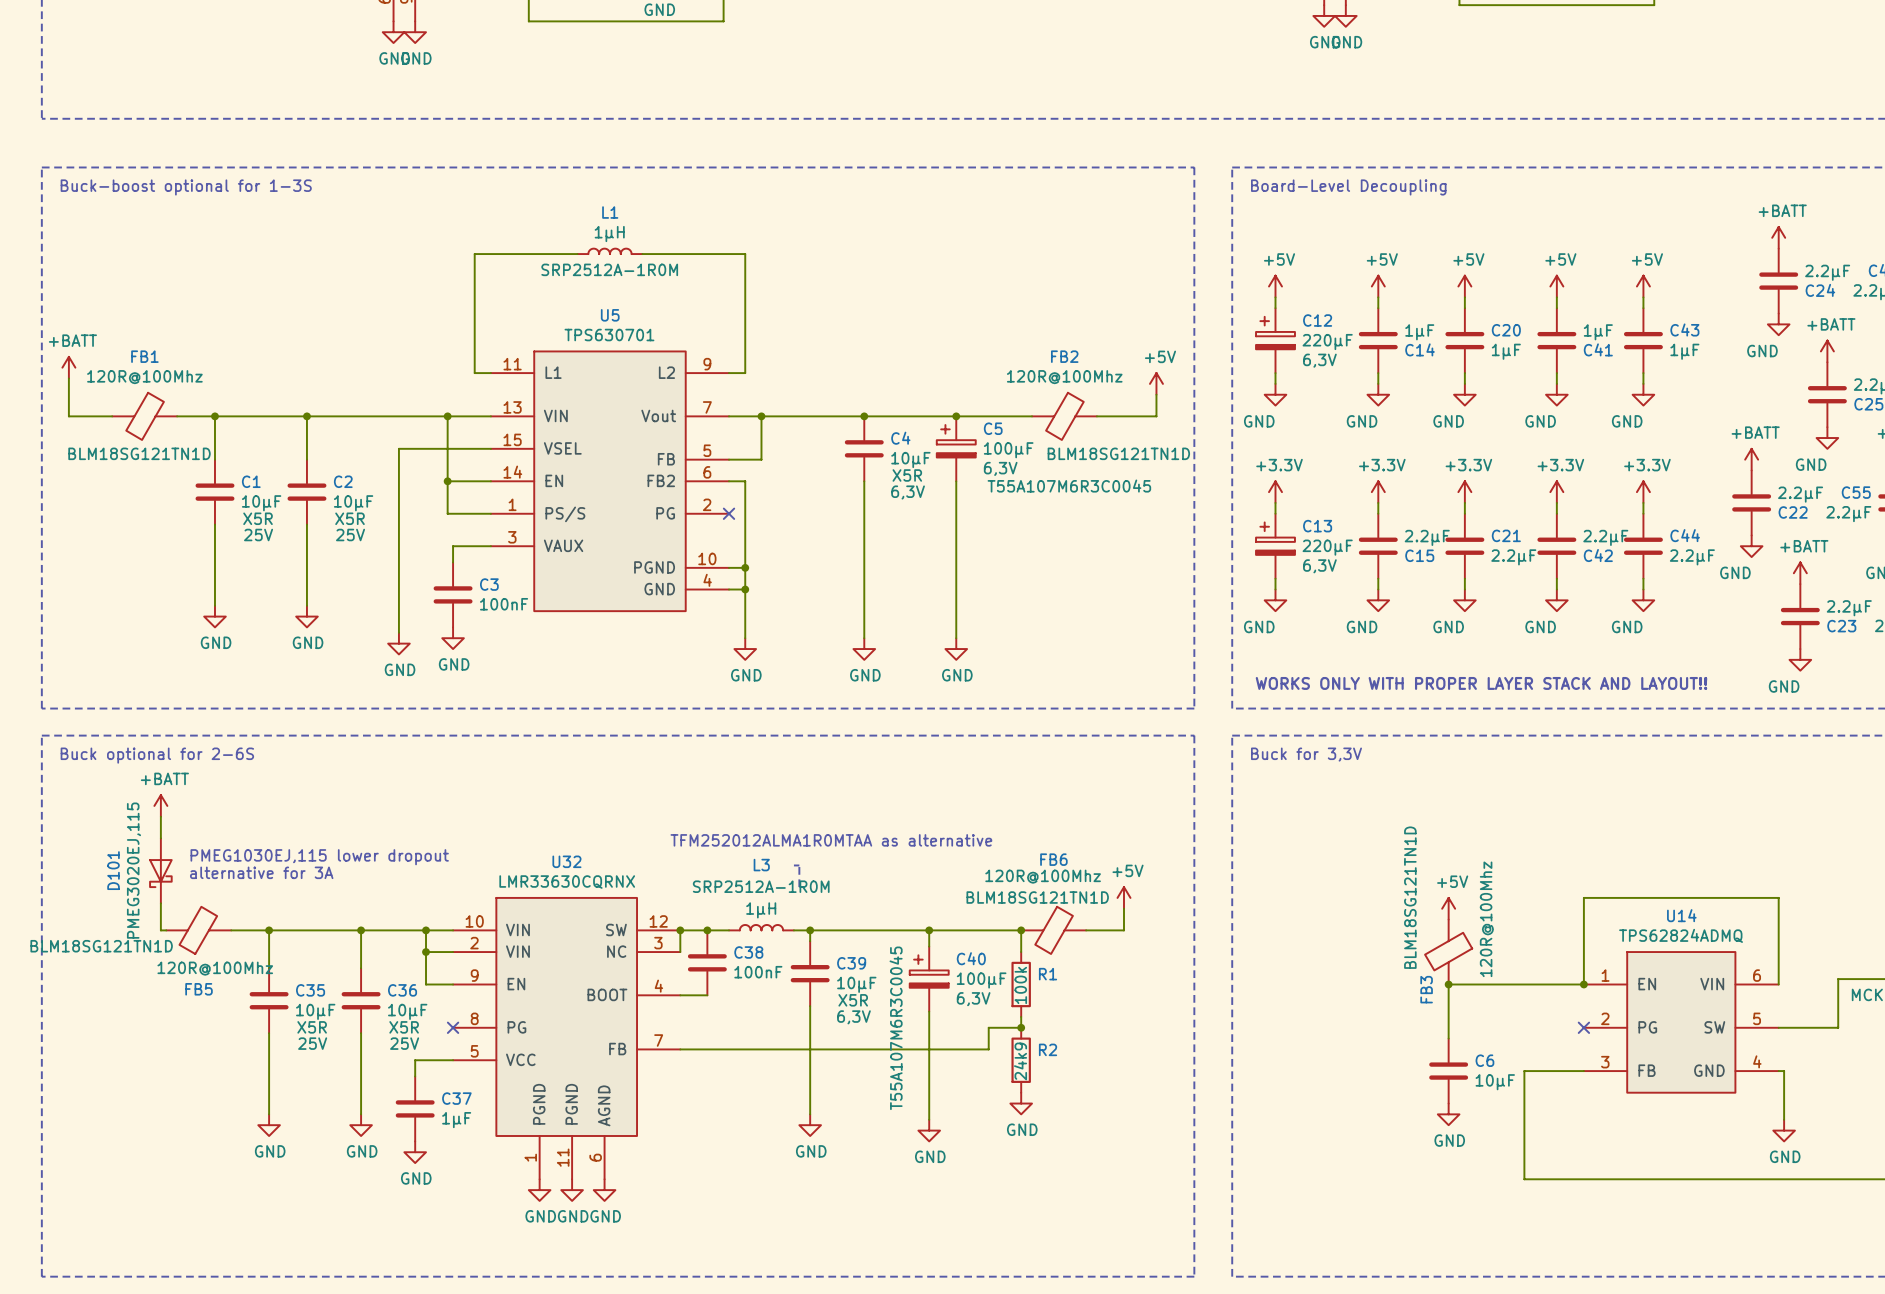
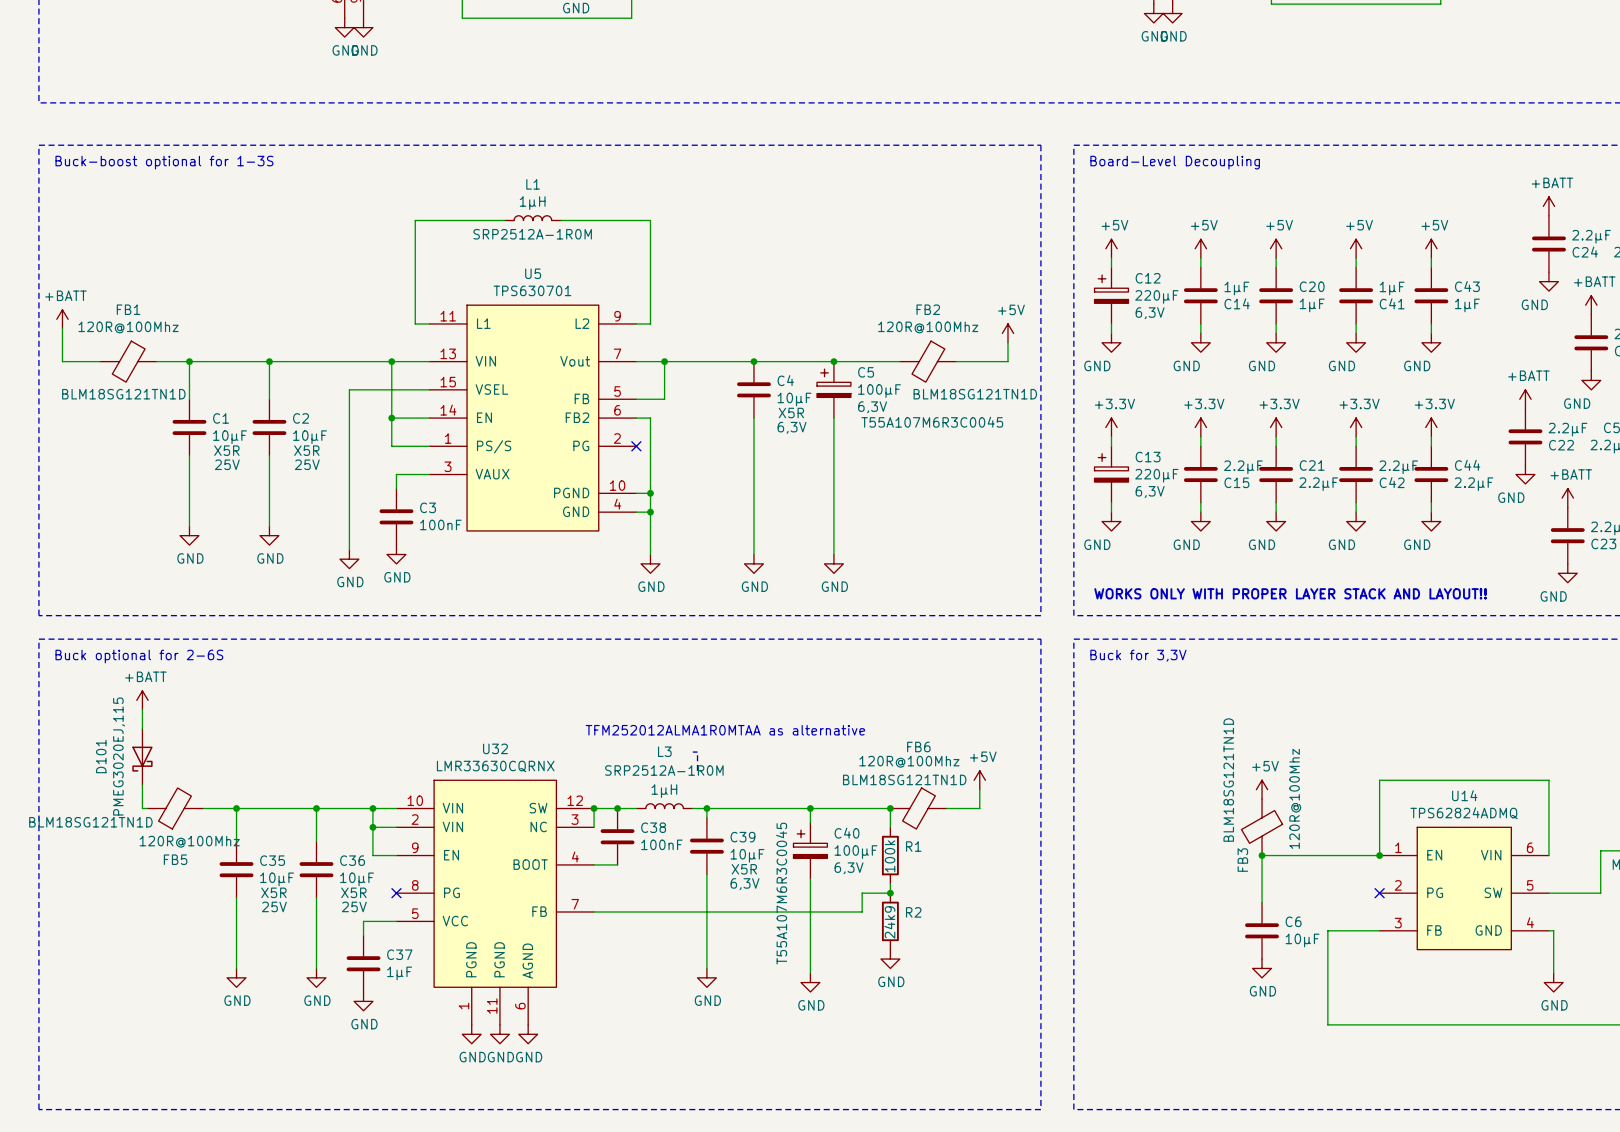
text: PMEG1030EJ,115 lower dropout (319, 857) -> none
text: alternative for 3A (261, 872) -> none

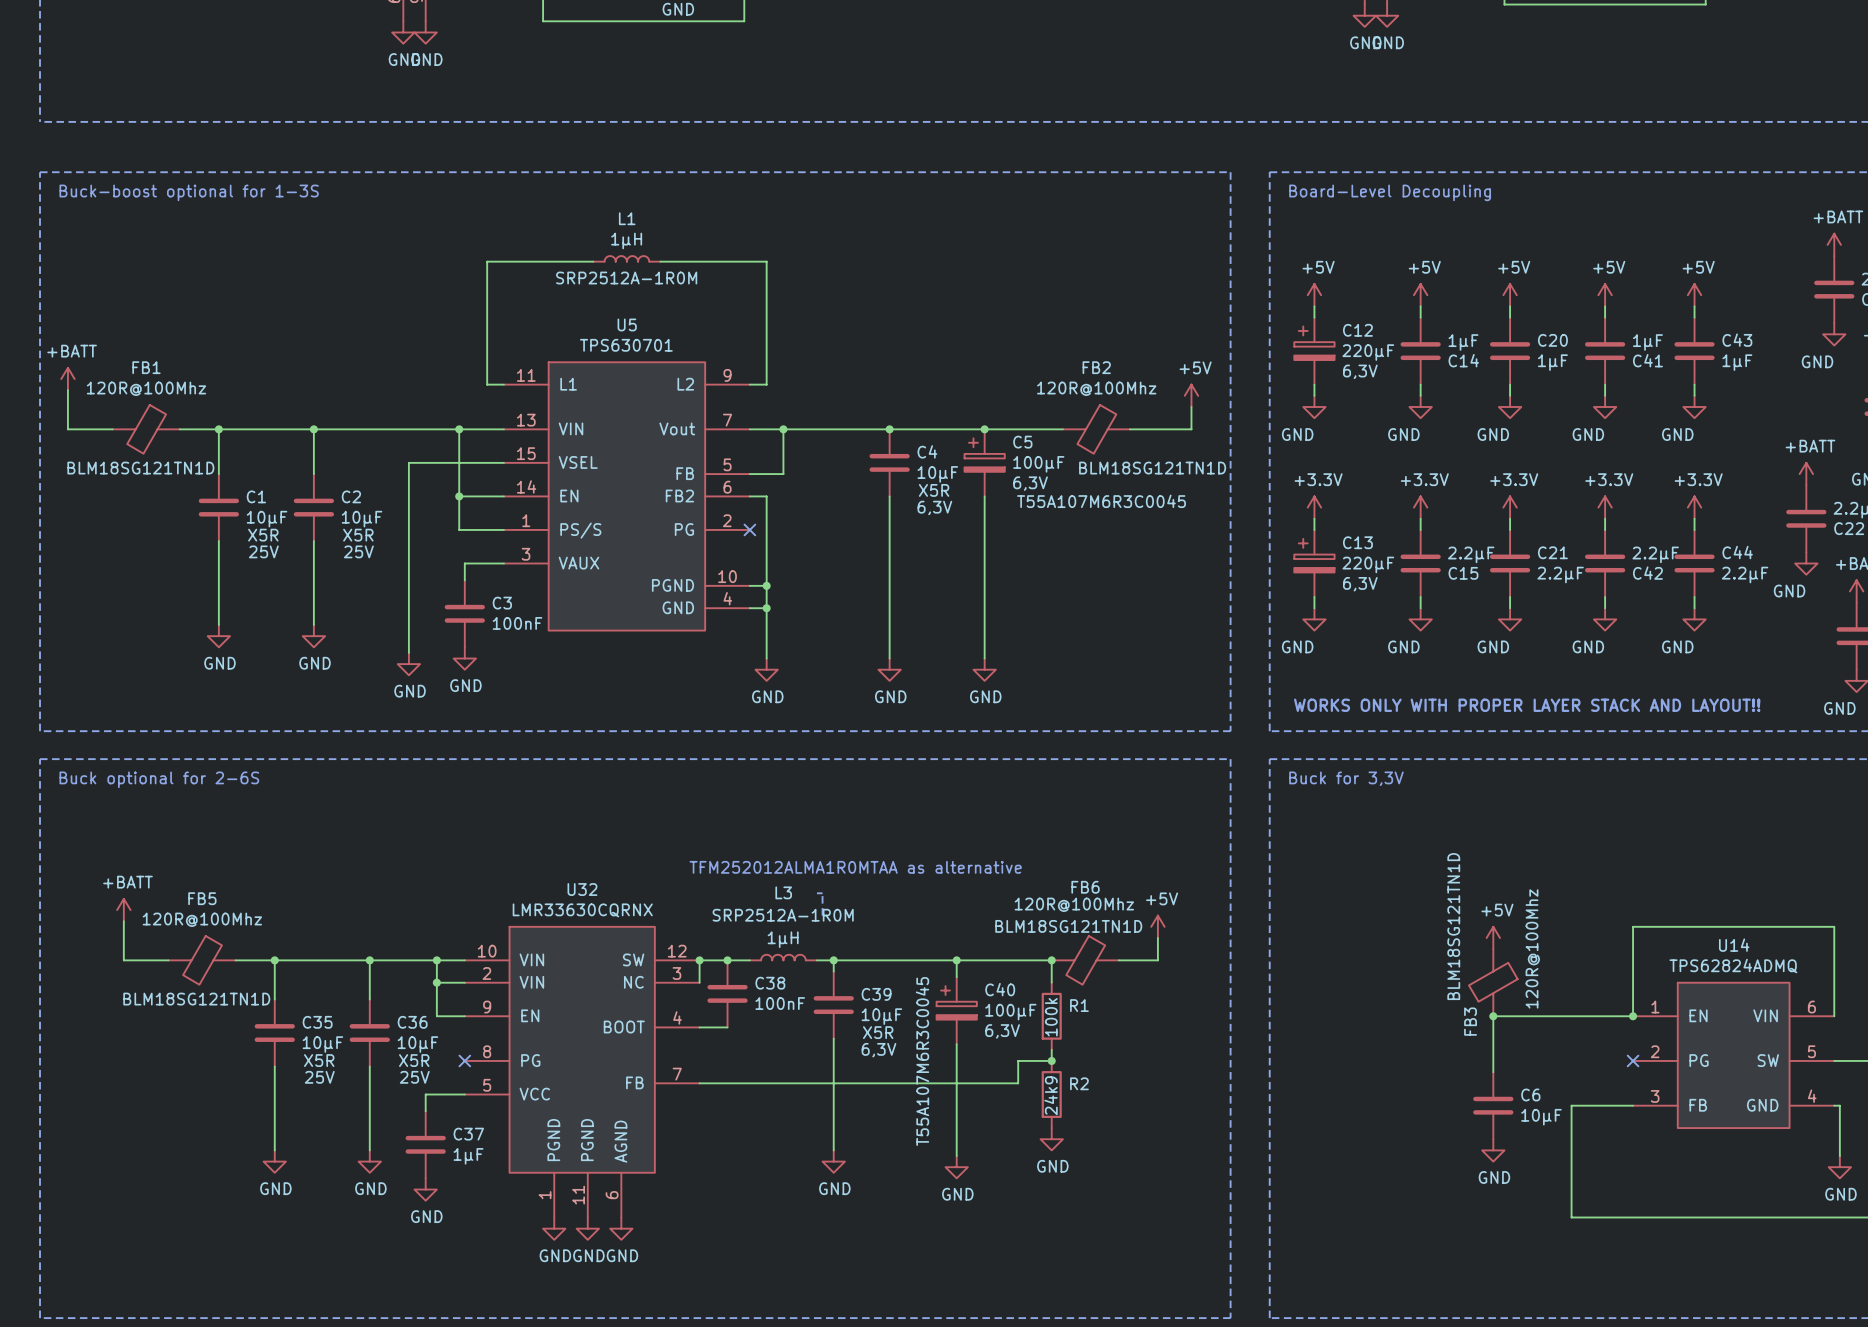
power symbol position: +BATT (142, 700) -> +BATT (123, 910)
wire: (142, 709) (142, 728) -> none
D101: PMEG3020EJ,115 (142, 756) -> none
wire: (142, 784) (142, 808) -> (123, 921) (123, 960) (162, 960)
FB5 rotation: 0° (174, 808) -> 180° (202, 960)
FB5 text position: BLM18SG121TN1D (90, 822) -> BLM18SG121TN1D (196, 999)

